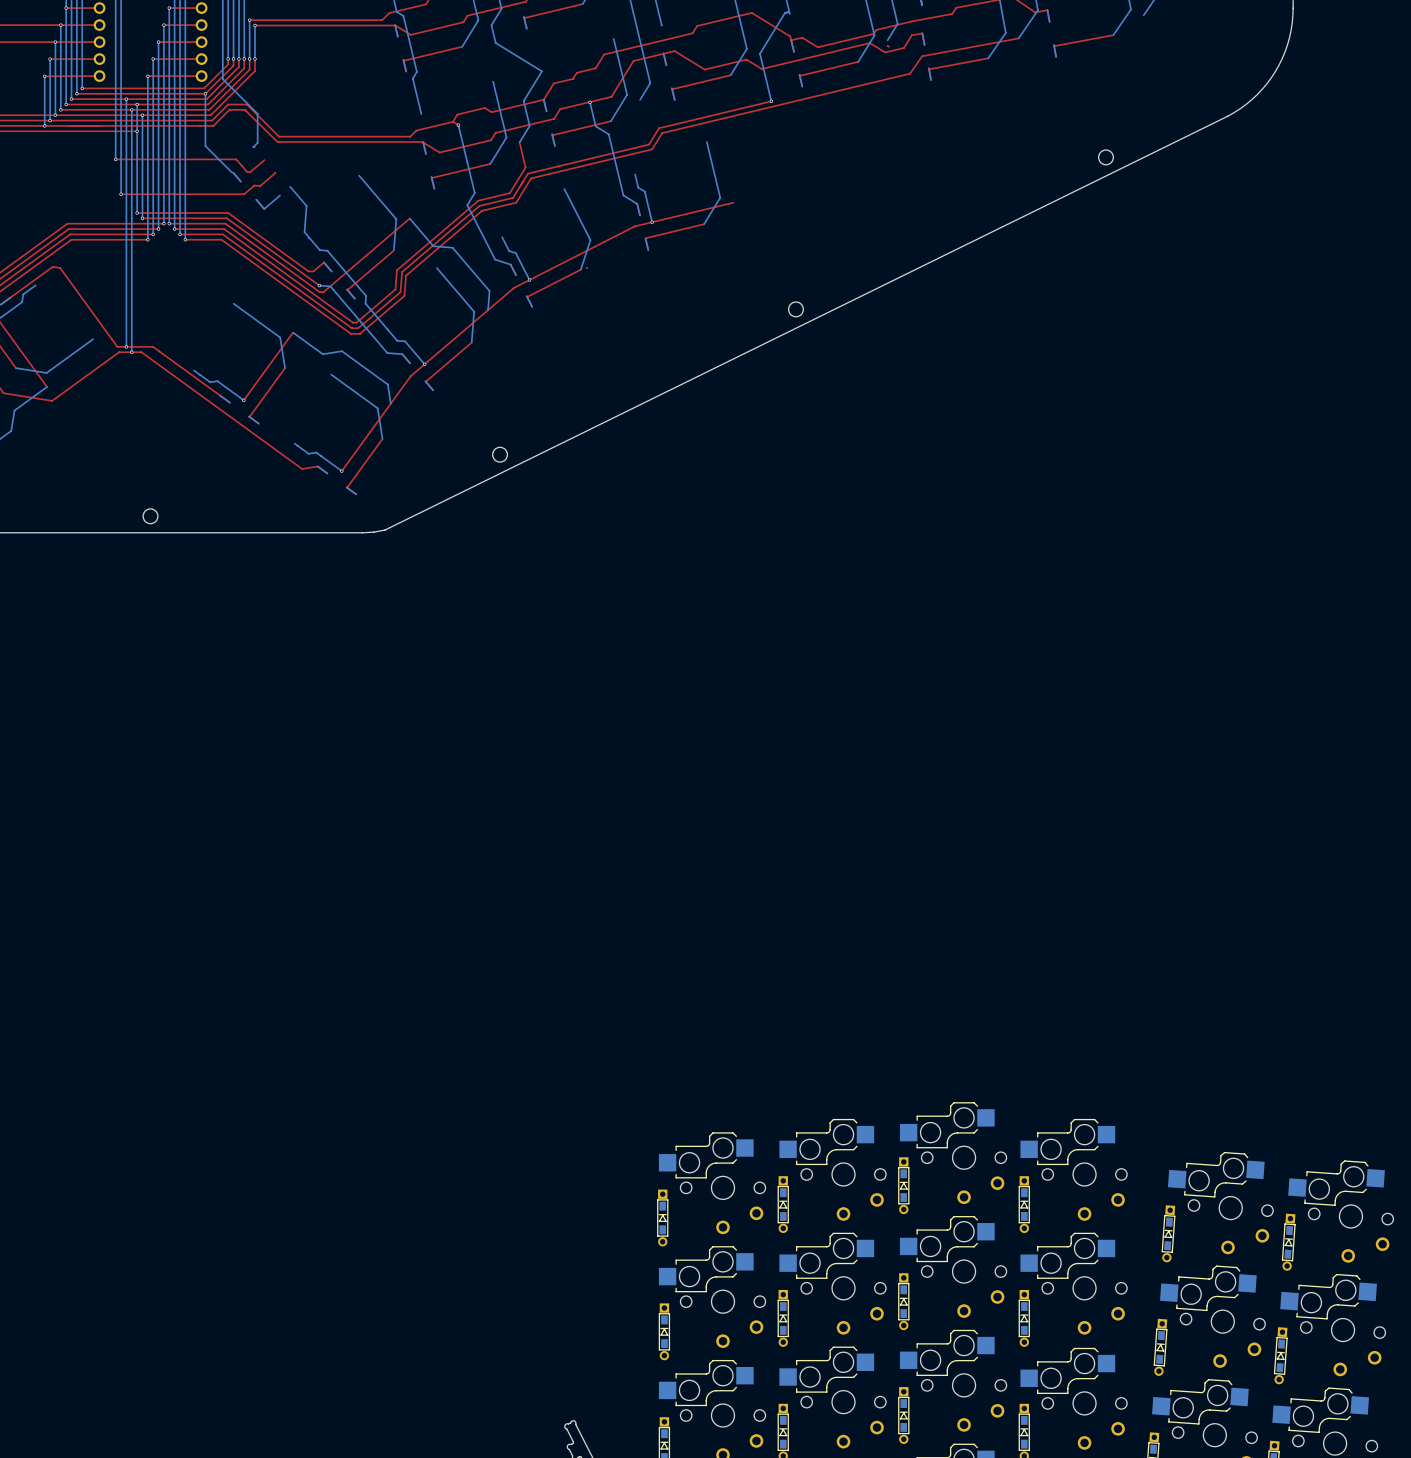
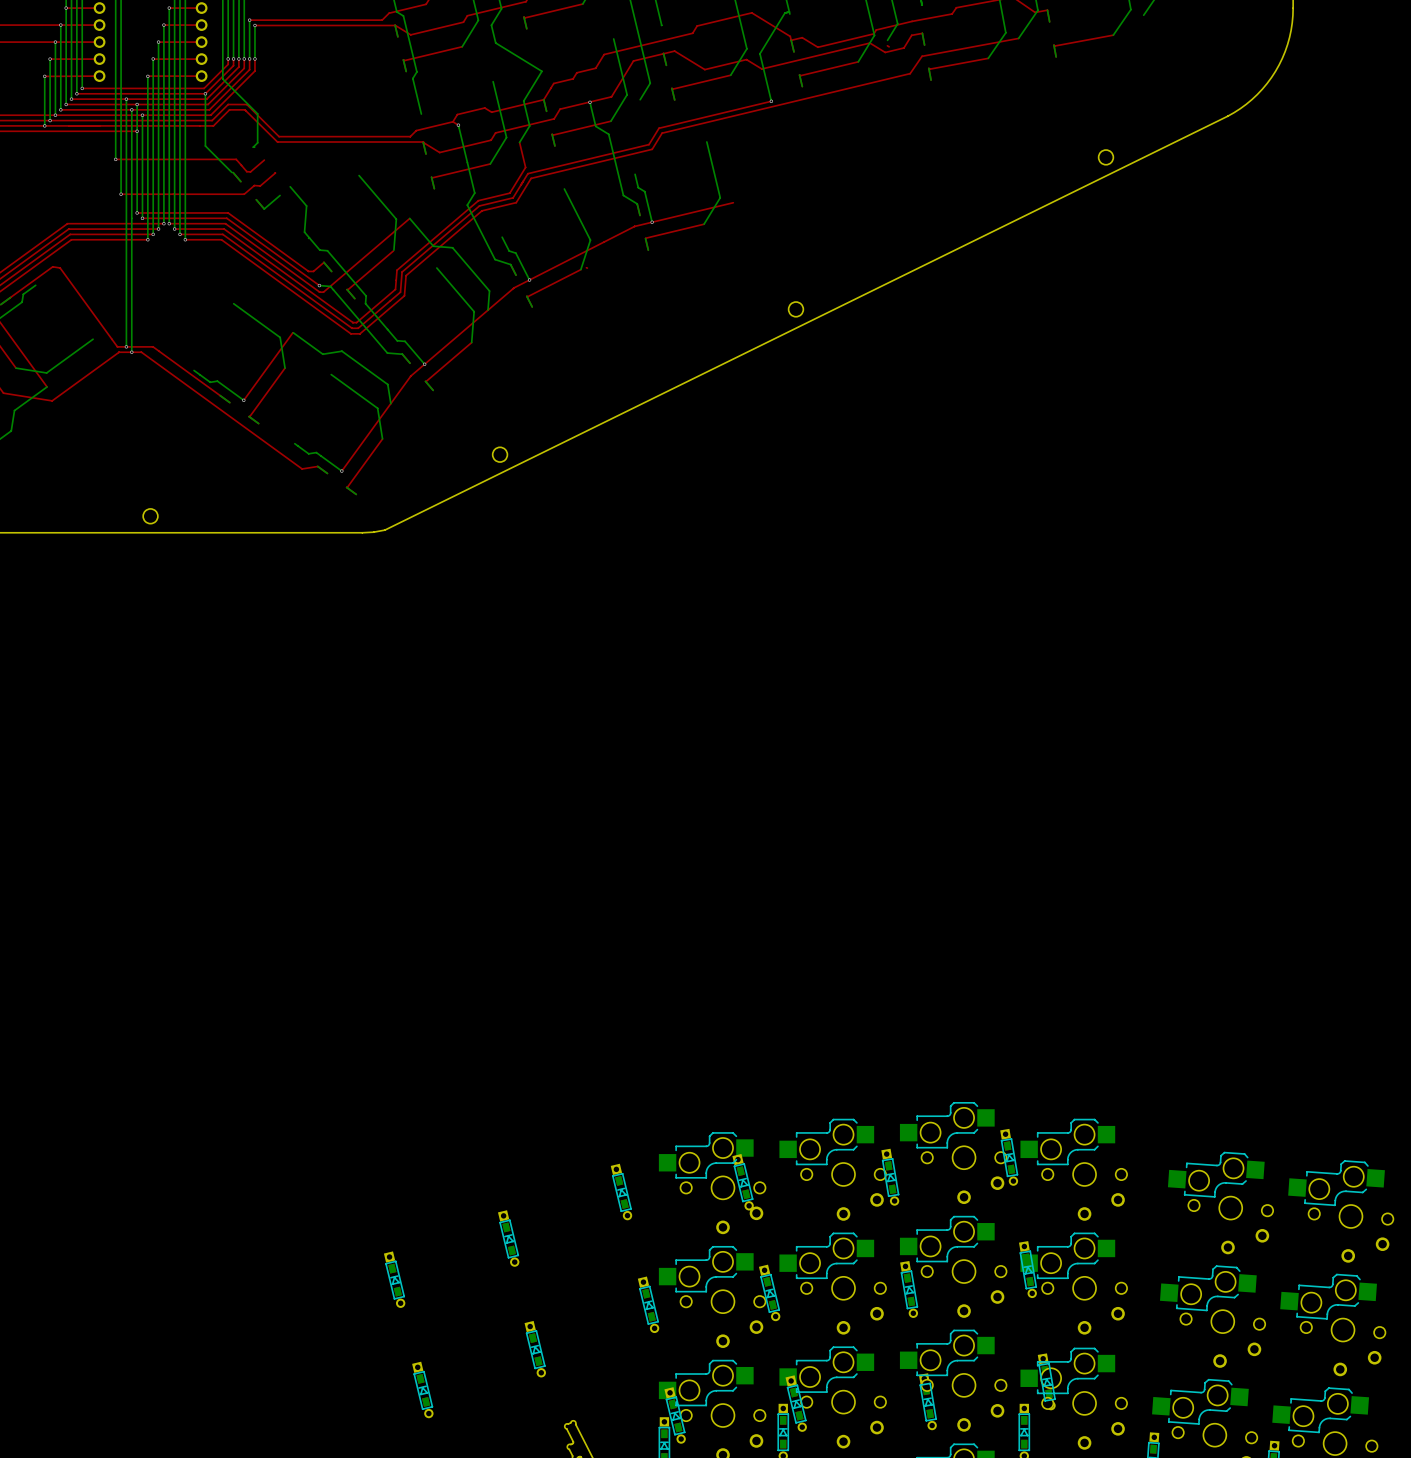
part: none -> (1009, 1157)
part: none -> (890, 1177)
part: none -> (743, 1182)
part: (903, 1185) -> none
part: none -> (621, 1192)
part: (783, 1204) -> none
part: (1024, 1204) -> none
part: (662, 1217) -> none
part: (1168, 1233) -> none
part: none -> (508, 1238)
part: (1288, 1242) -> none
part: none -> (1027, 1269)
part: none -> (394, 1279)
part: none -> (909, 1289)
part: none -> (769, 1292)
part: (903, 1301) -> none
part: none -> (648, 1304)
part: (783, 1318) -> none
part: (1024, 1318) -> none
part: (664, 1331) -> none
part: (1160, 1347) -> none
part: none -> (535, 1349)
part: (1280, 1355) -> none
part: none -> (1046, 1381)
part: none -> (422, 1389)
part: none -> (927, 1401)
part: none -> (796, 1403)
part: none -> (675, 1415)
part: (903, 1415) -> none

